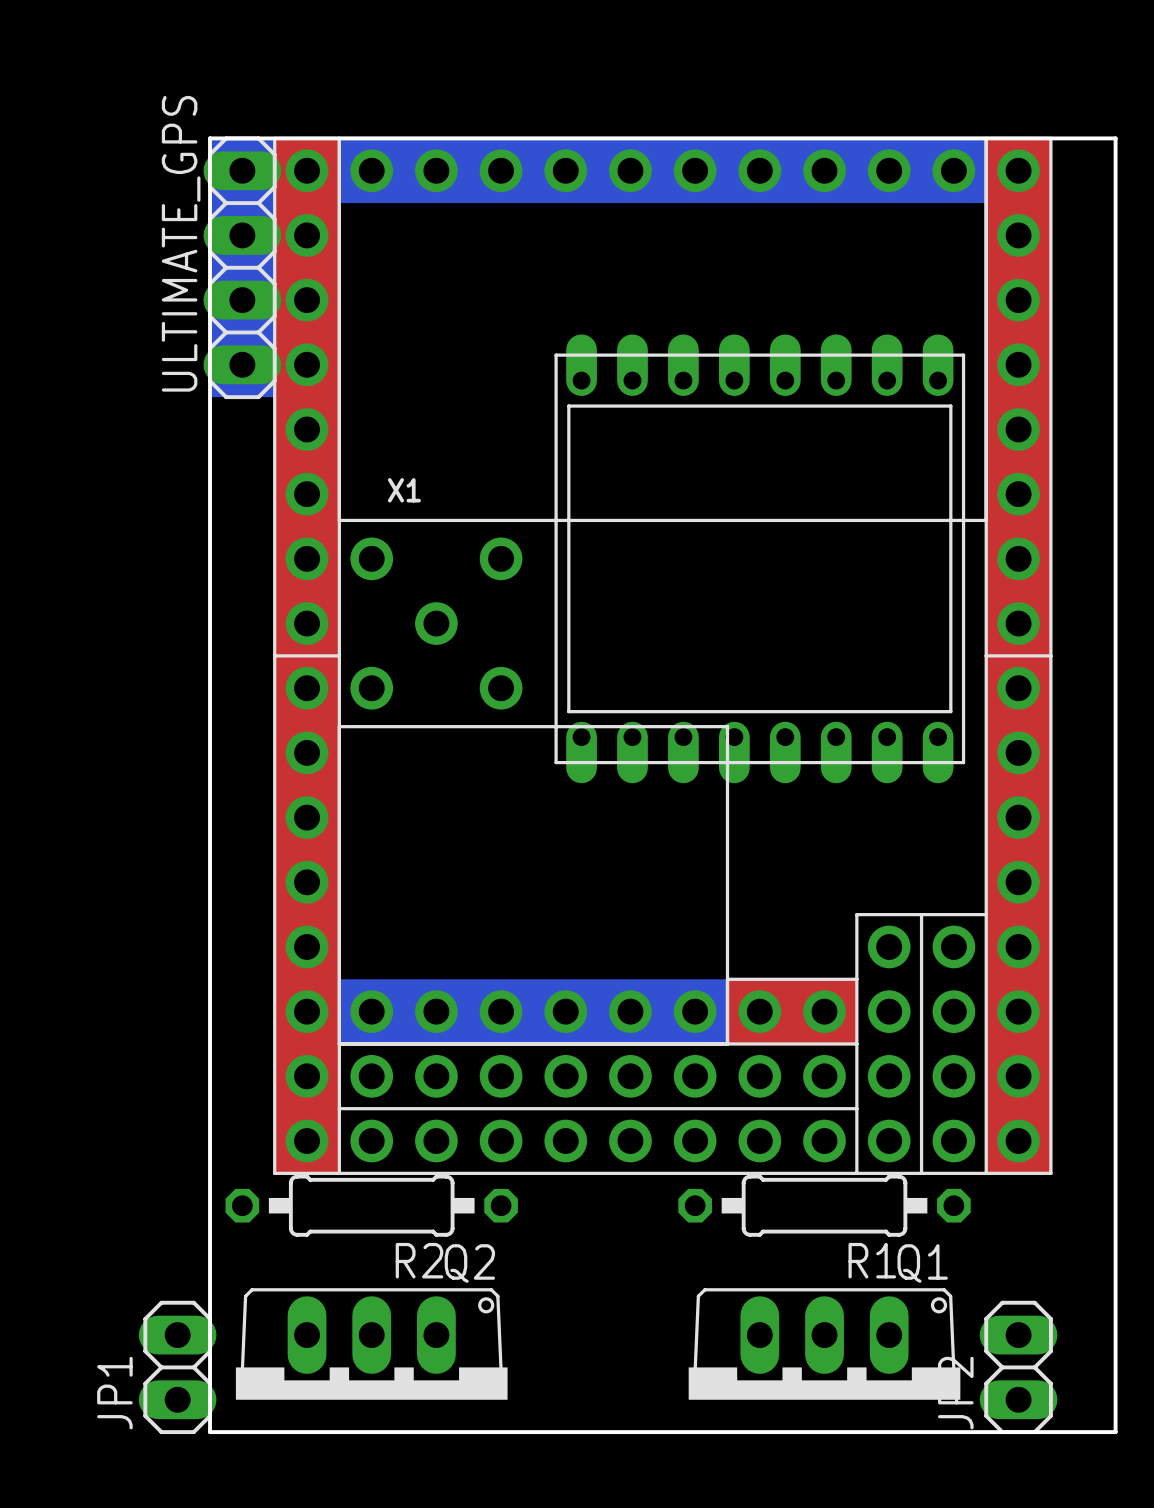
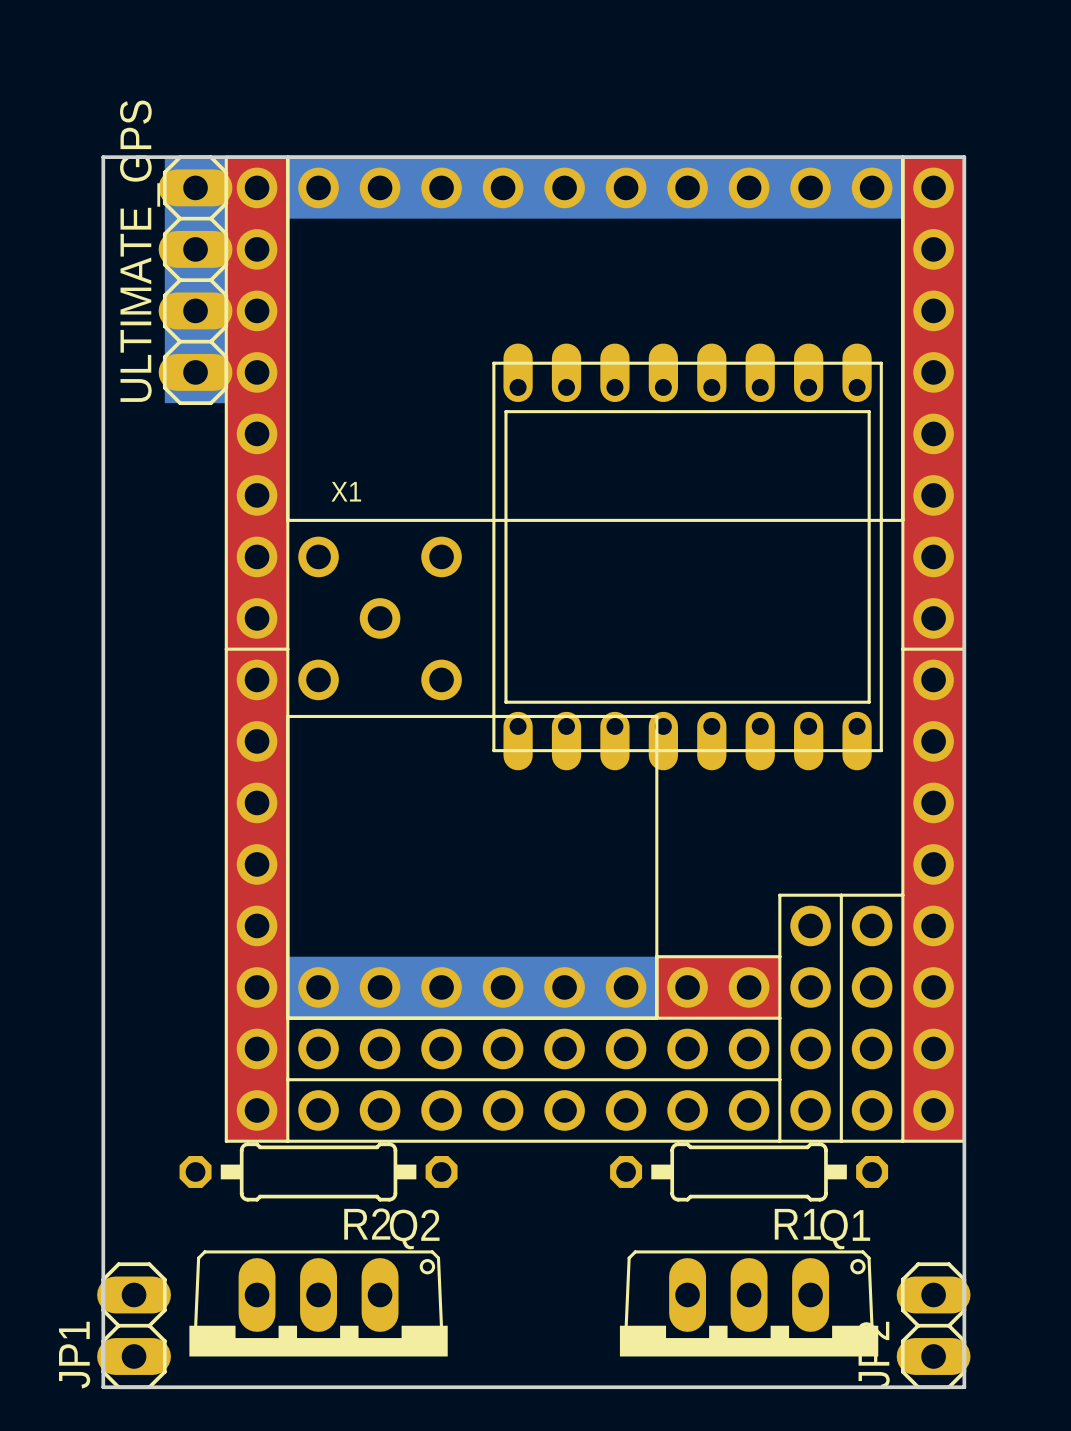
board edge: (210, 138) (210, 1432) -> (164, 157) (103, 157) (103, 1387) (164, 1387)
board edge: (1050, 138) (1115, 138) (1115, 1432) (1050, 1432) -> (964, 157) (964, 1387)

